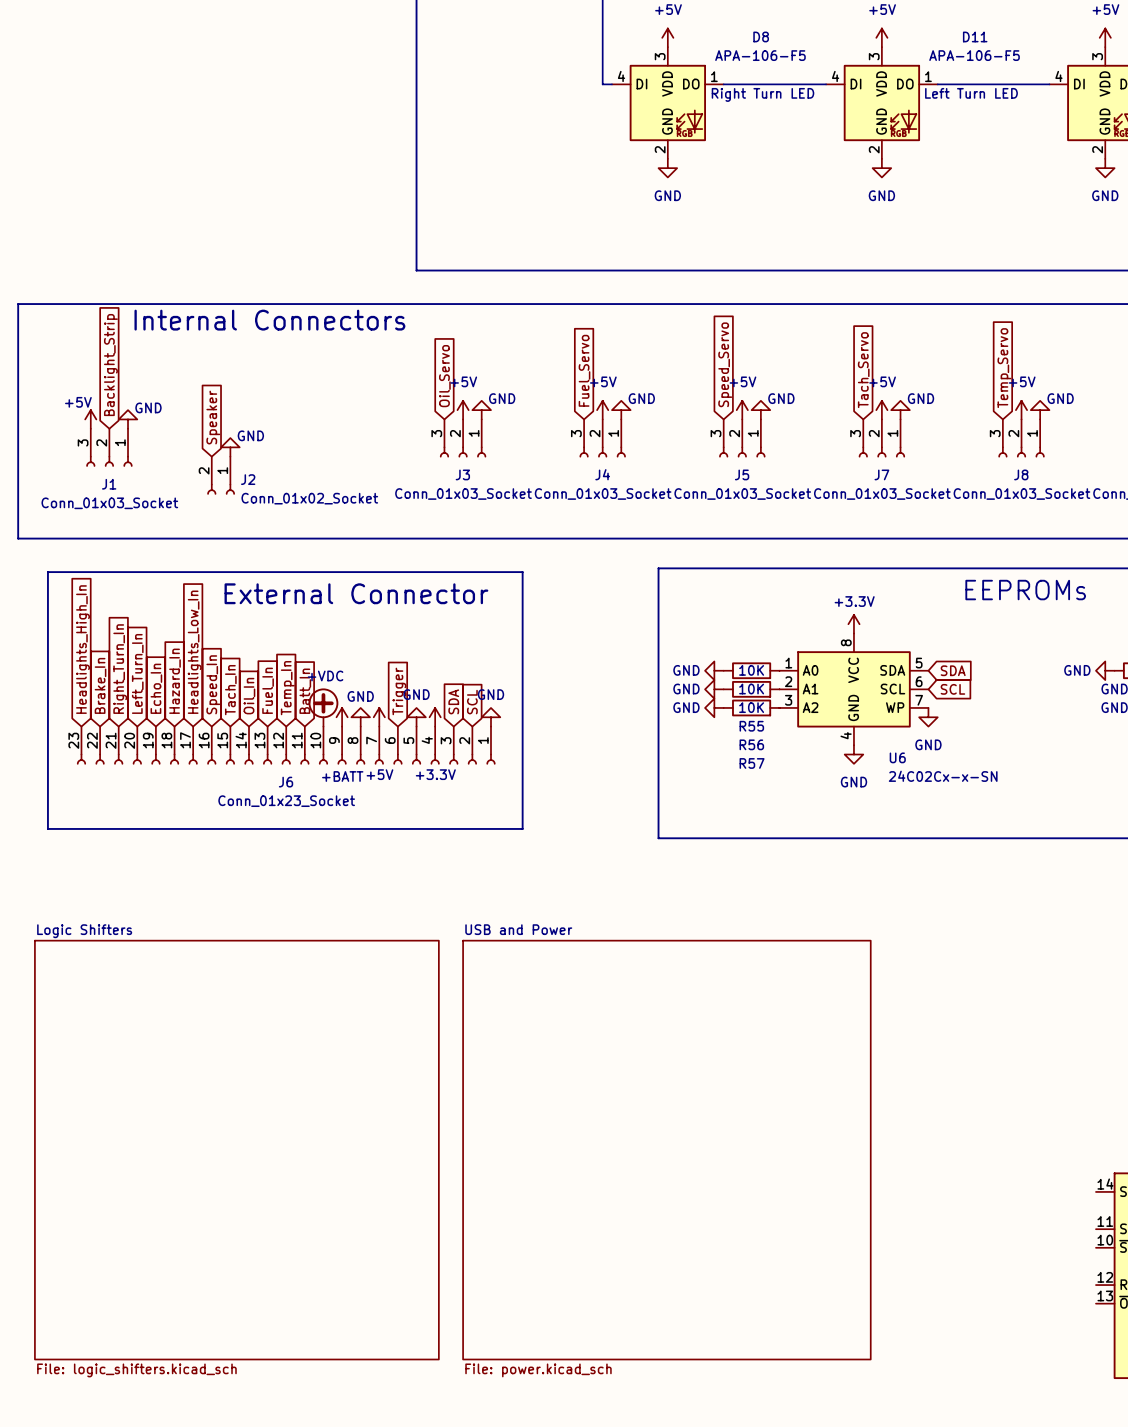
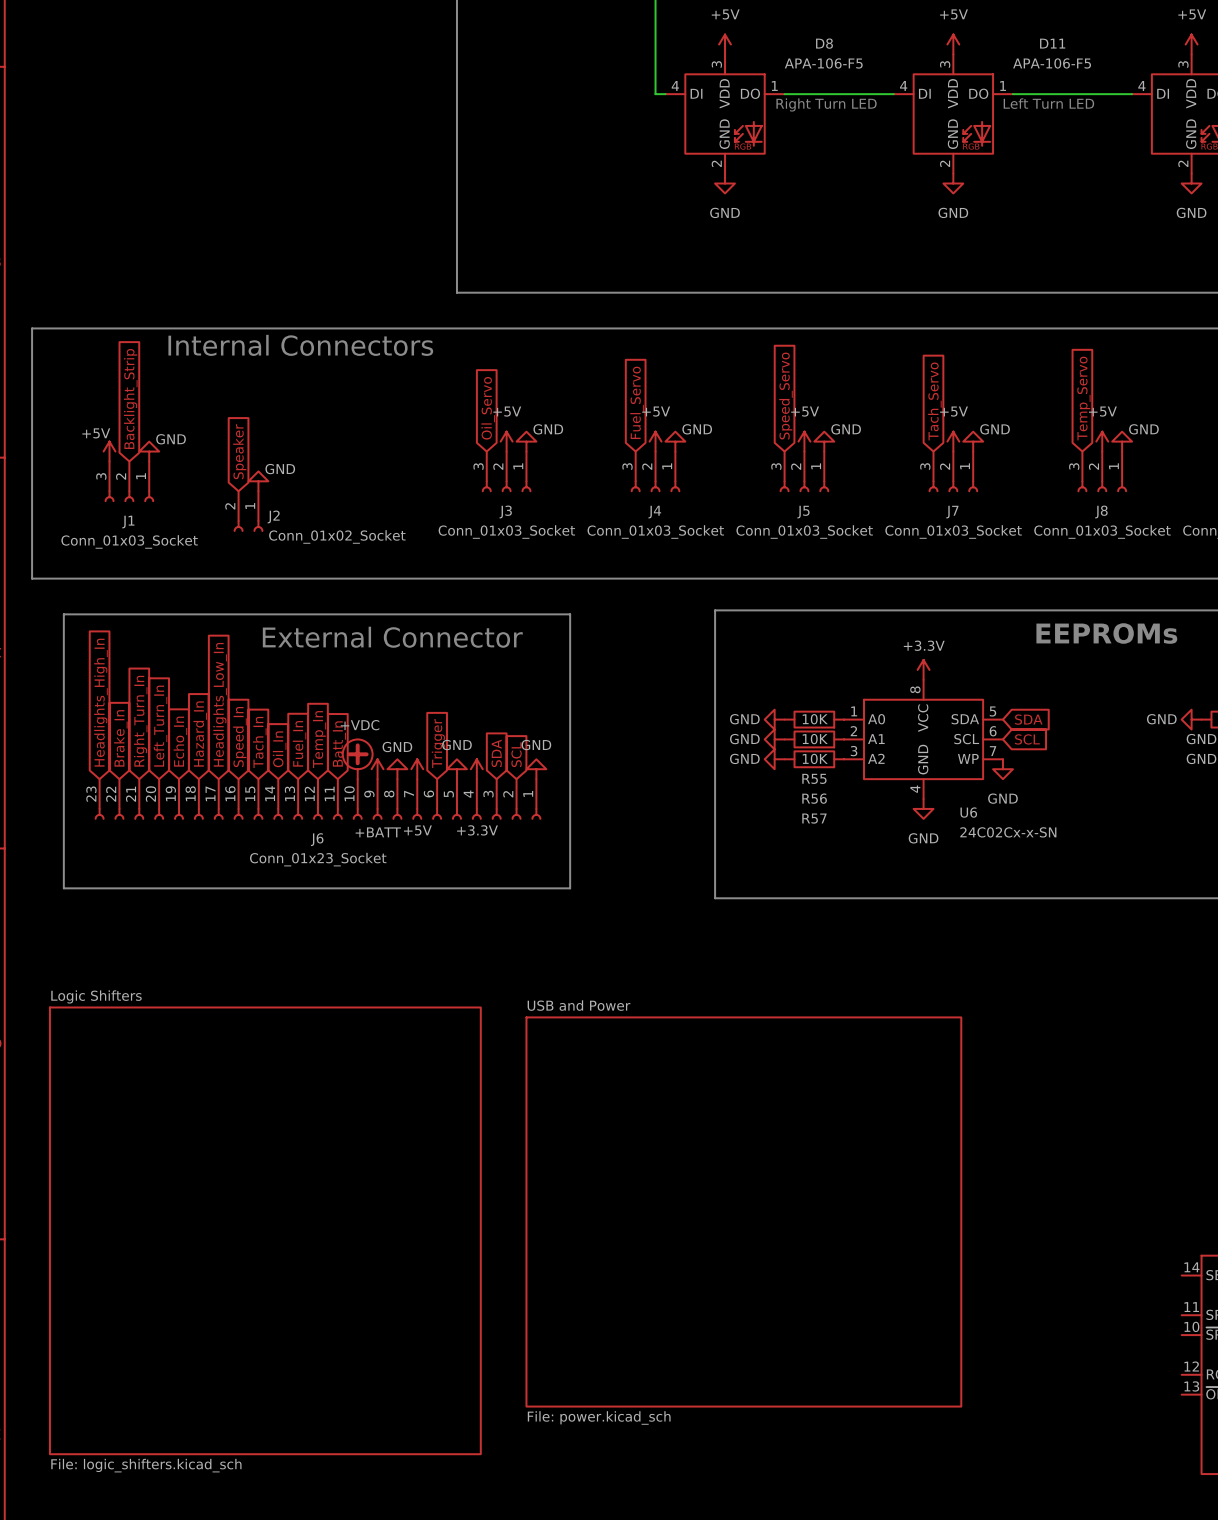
sheet USB and Power: none -> File: power.kicad_sch (743, 1211)
sheet USB and Power: File: power.kicad_sch (666, 1150) -> none

